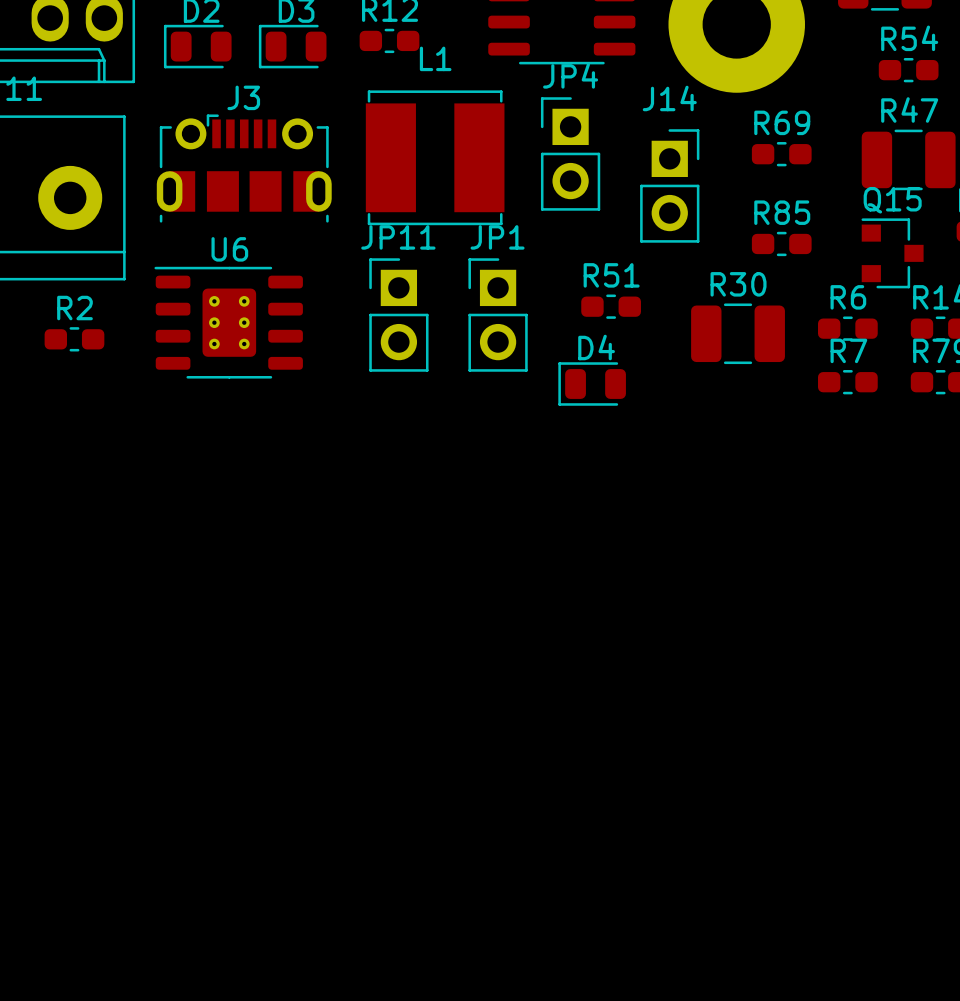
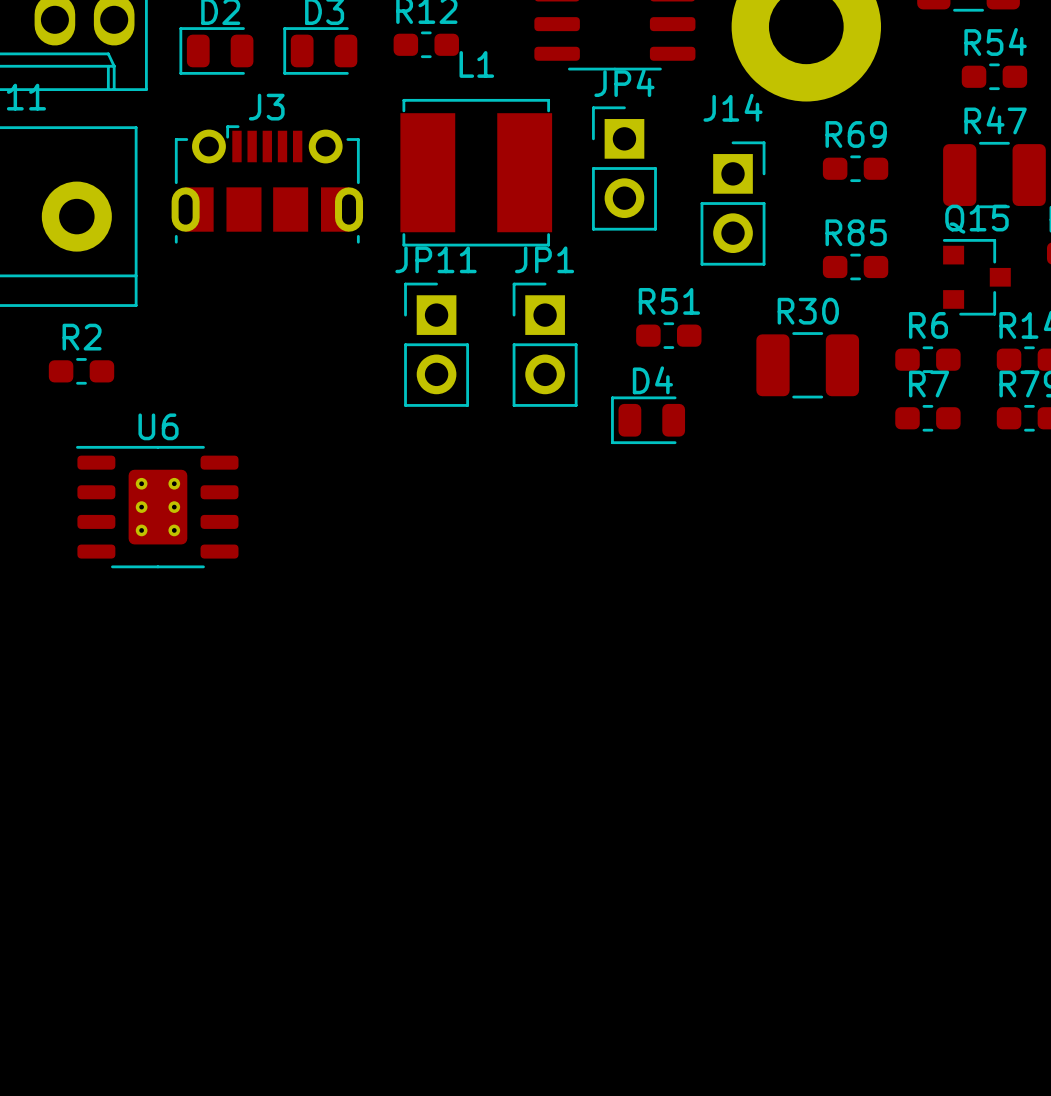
U6 position: (228, 322) -> (157, 507)

